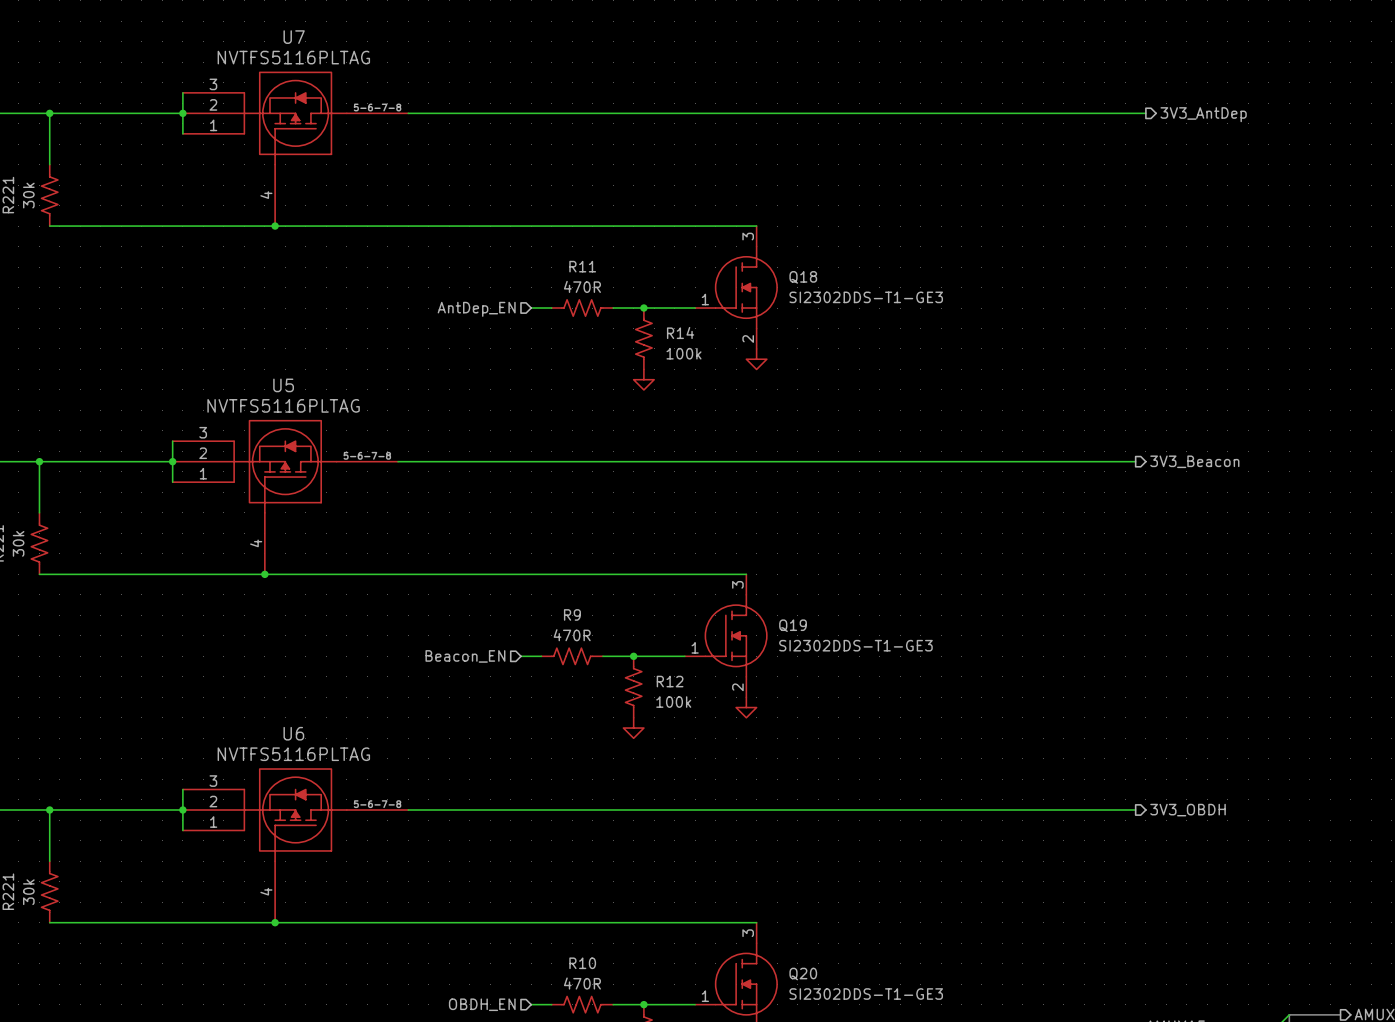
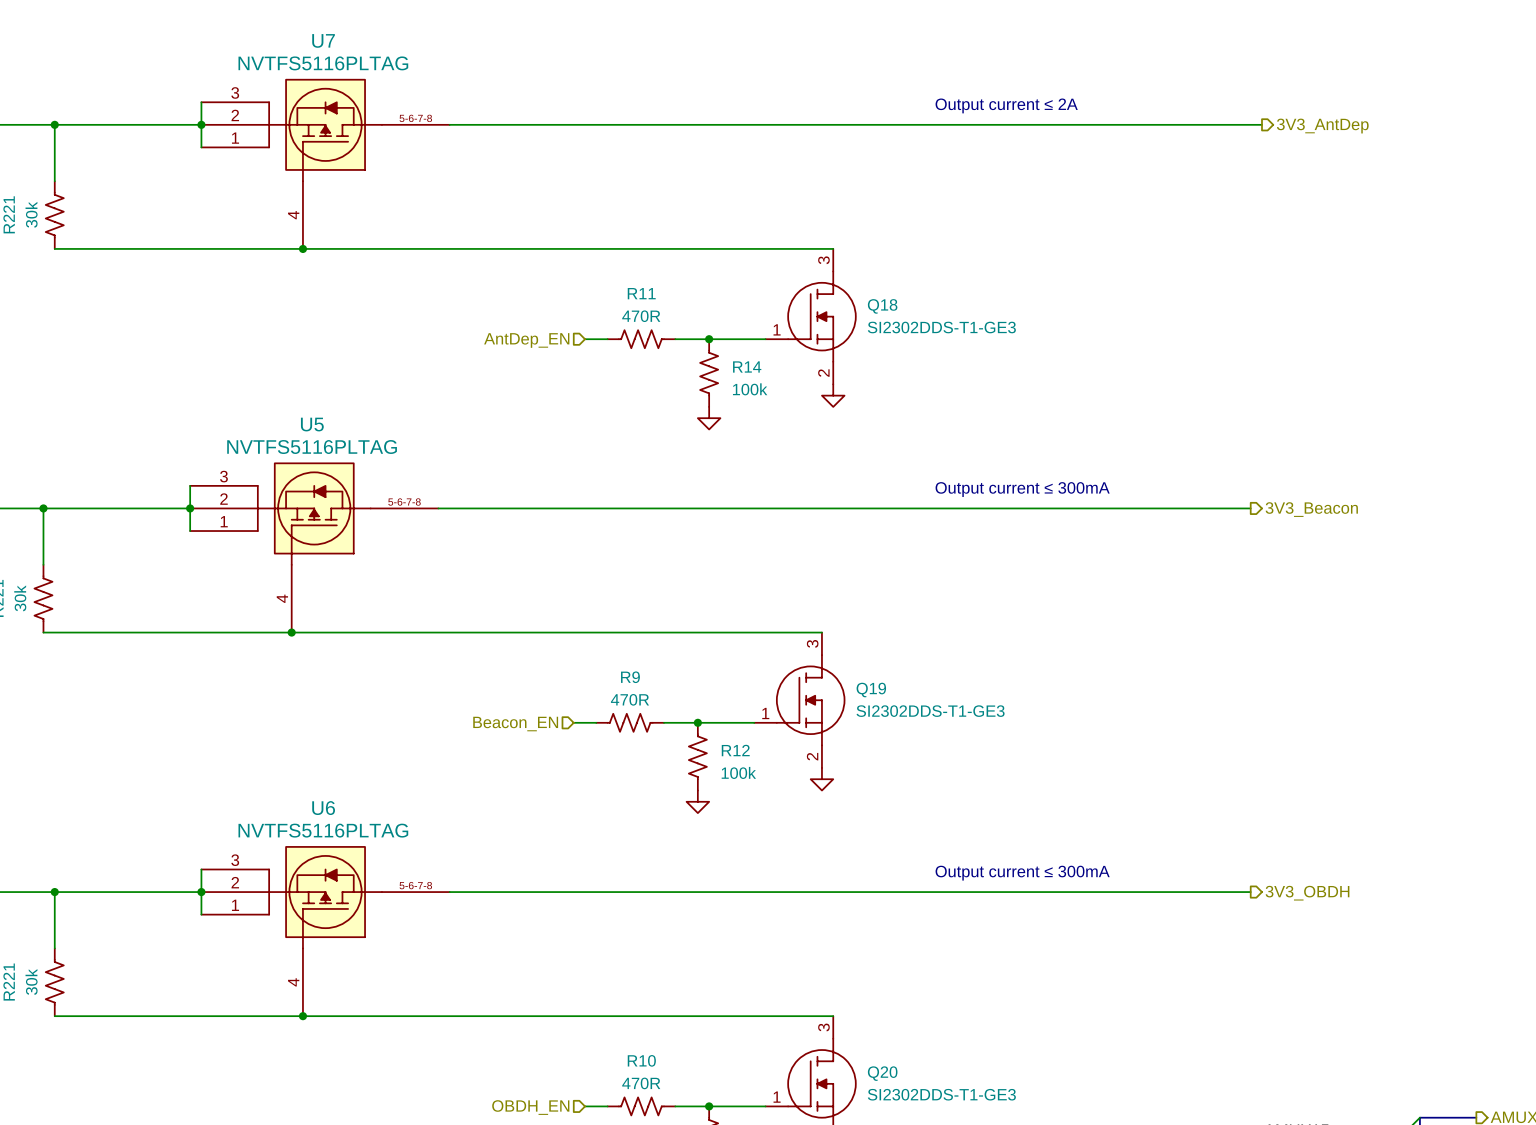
text: none -> Output current ≤ 2A (1006, 105)
text: none -> Output current ≤ 300mA (1022, 489)
text: none -> Output current ≤ 300mA (1022, 873)

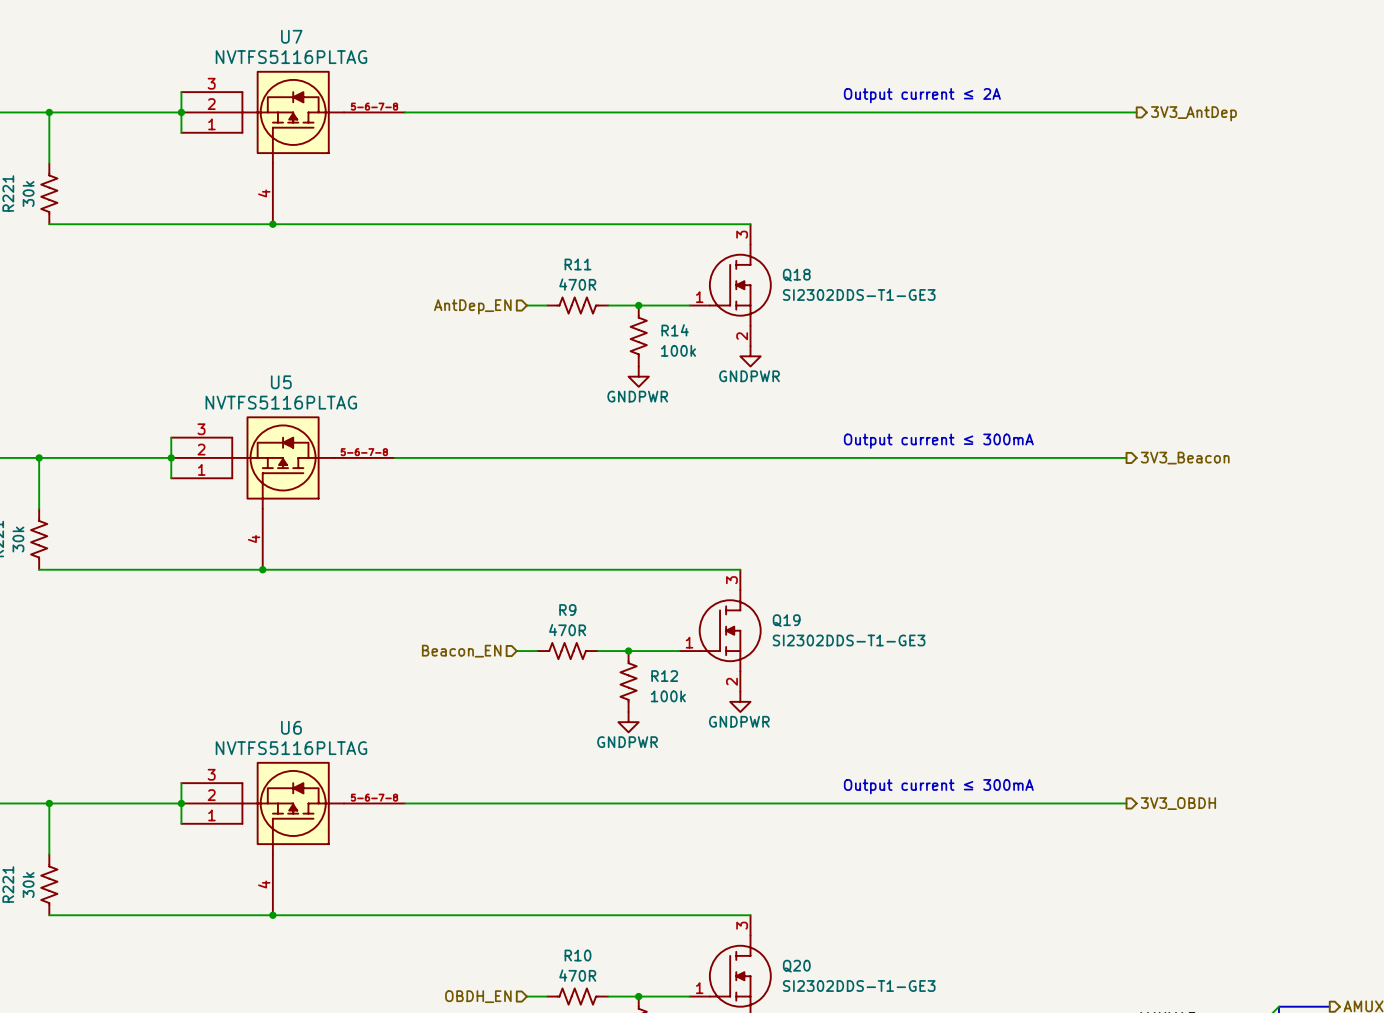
power symbol text: none -> GNDPWR (749, 376)
power symbol text: none -> GNDPWR (637, 396)
power symbol text: none -> GNDPWR (739, 721)
power symbol text: none -> GNDPWR (627, 742)

